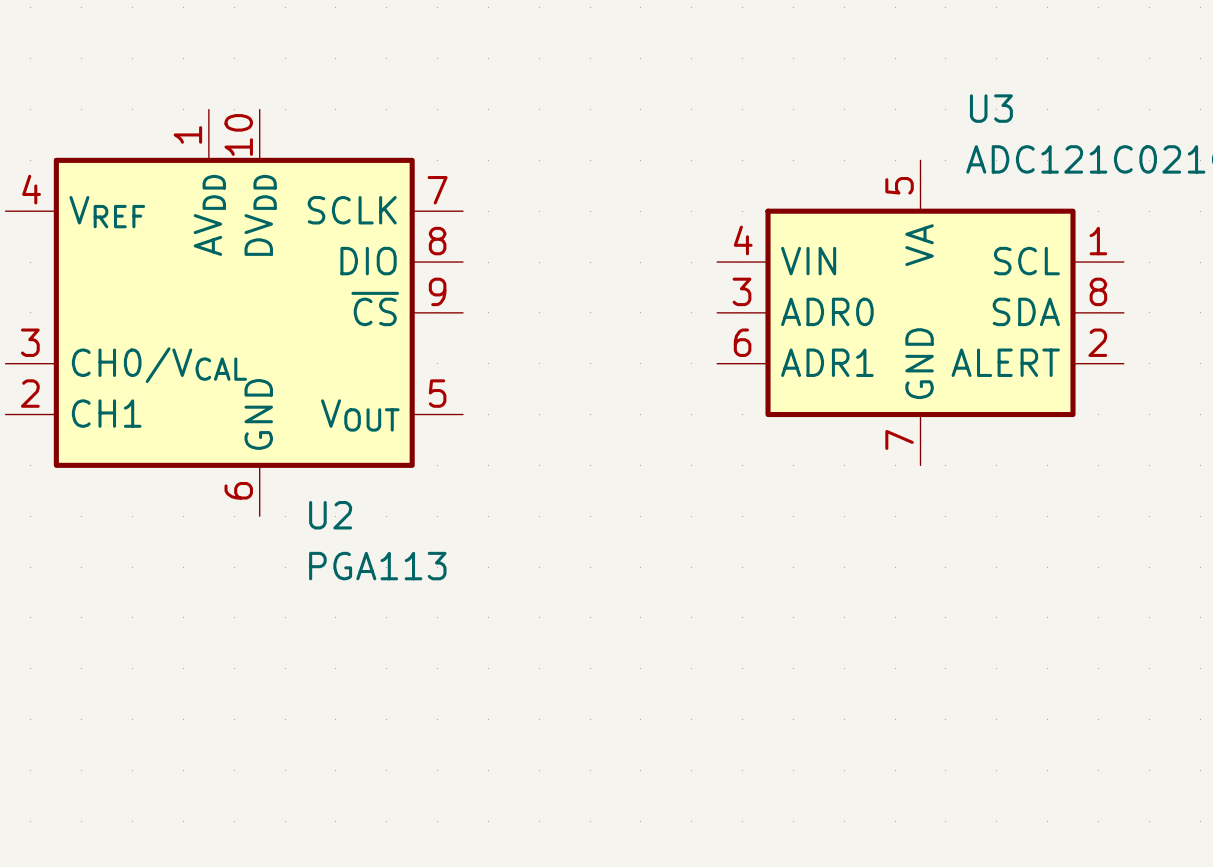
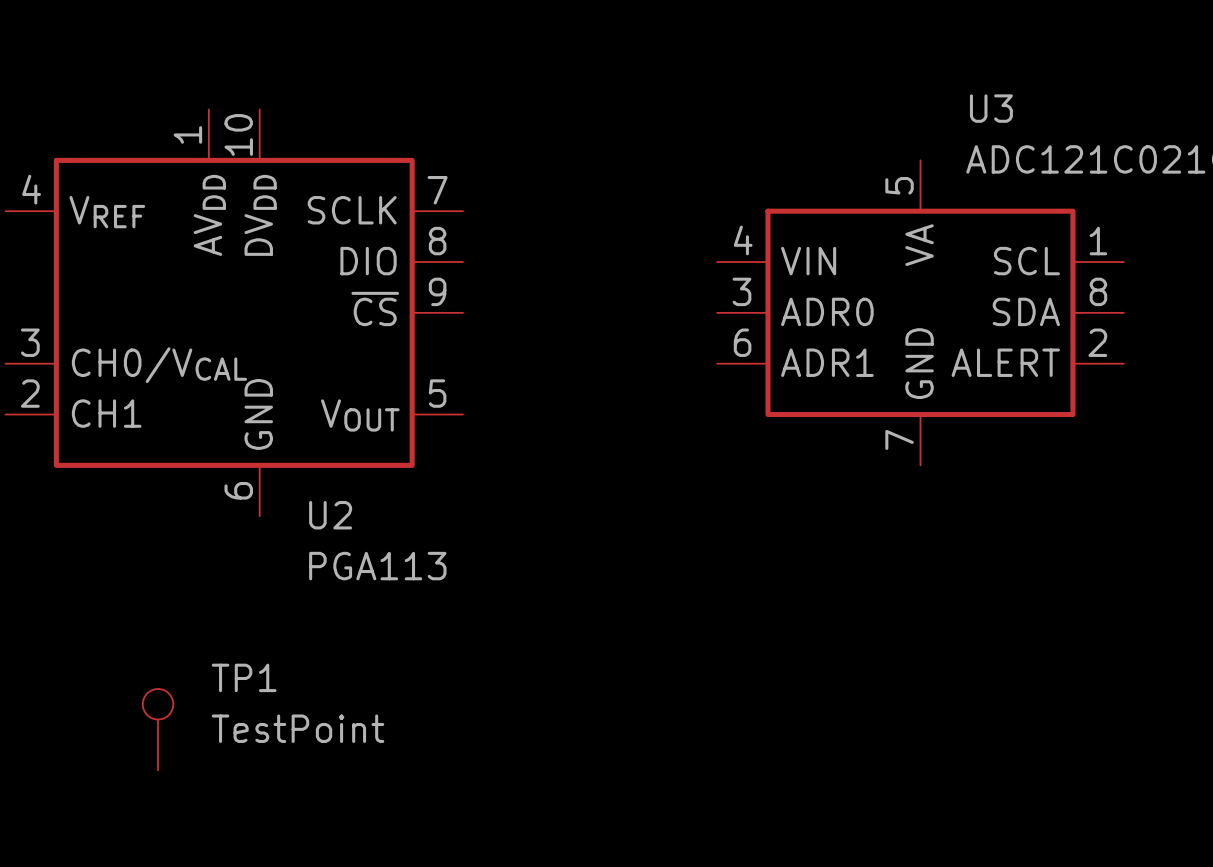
TP1: none -> TestPoint (158, 729)

